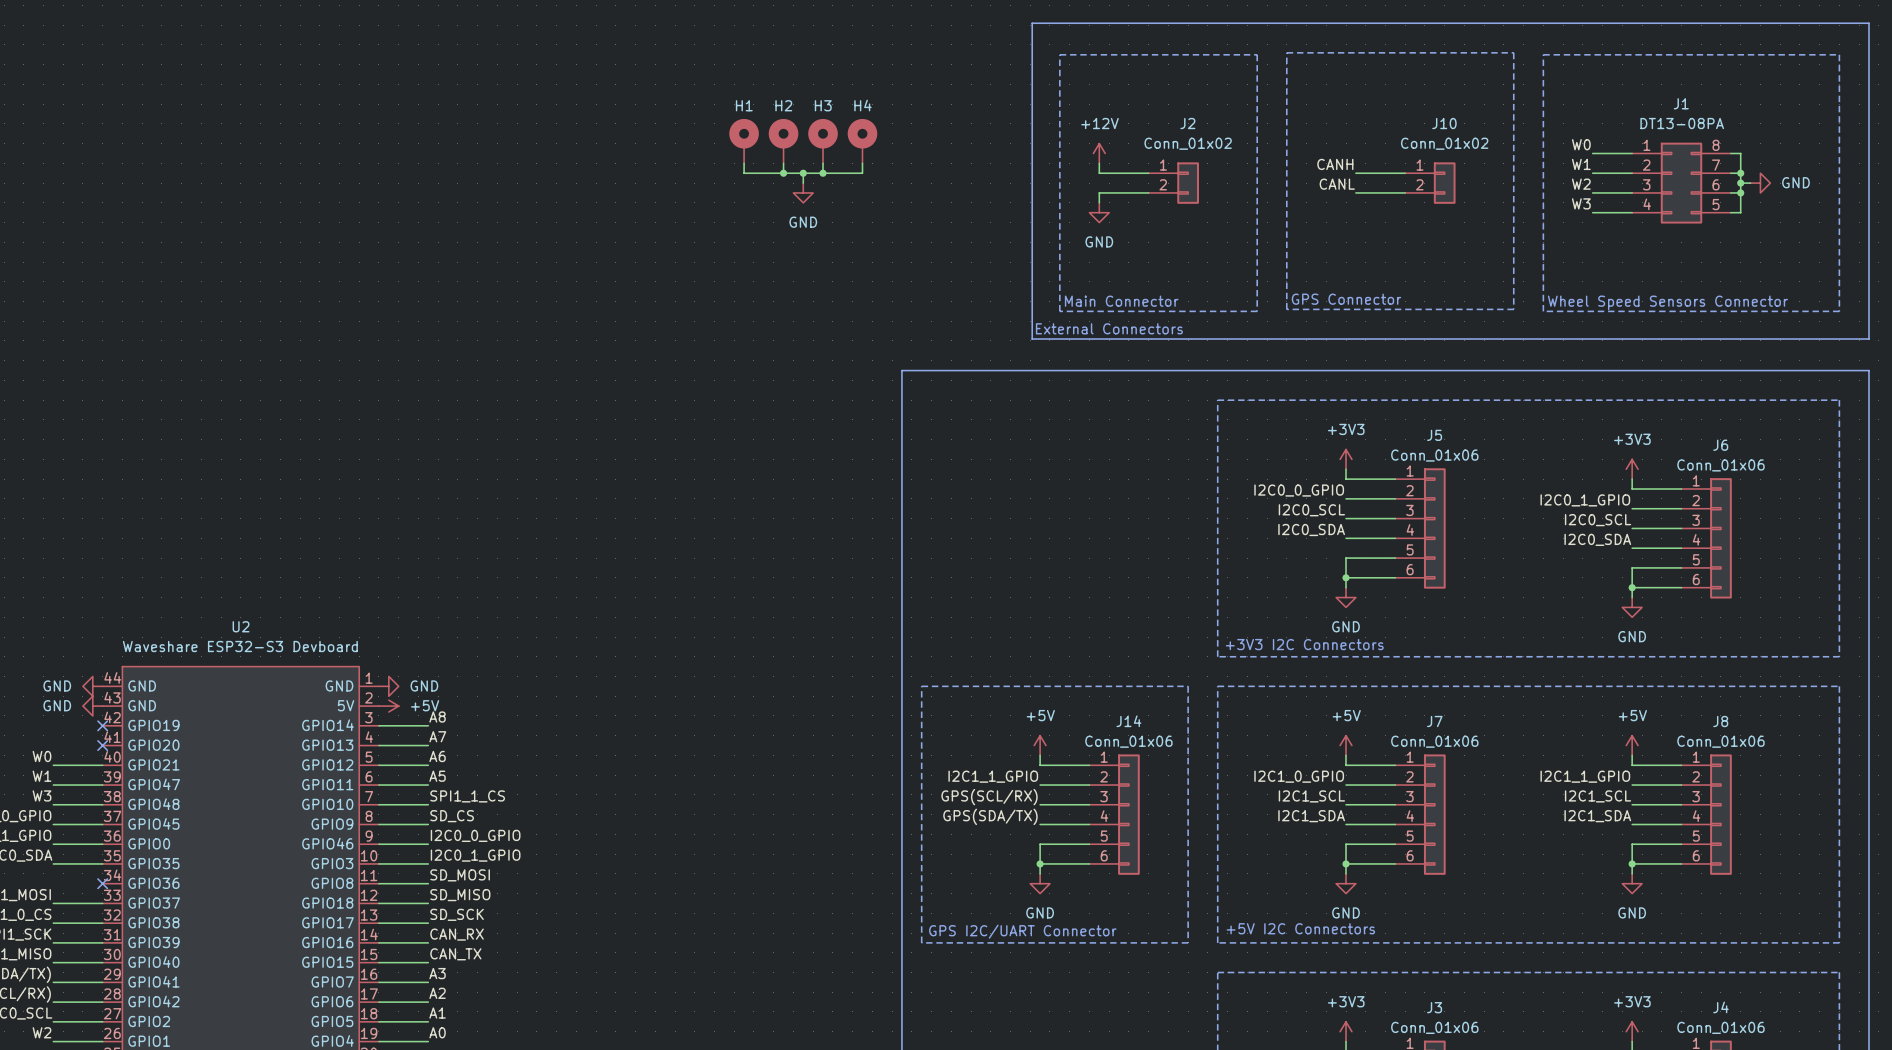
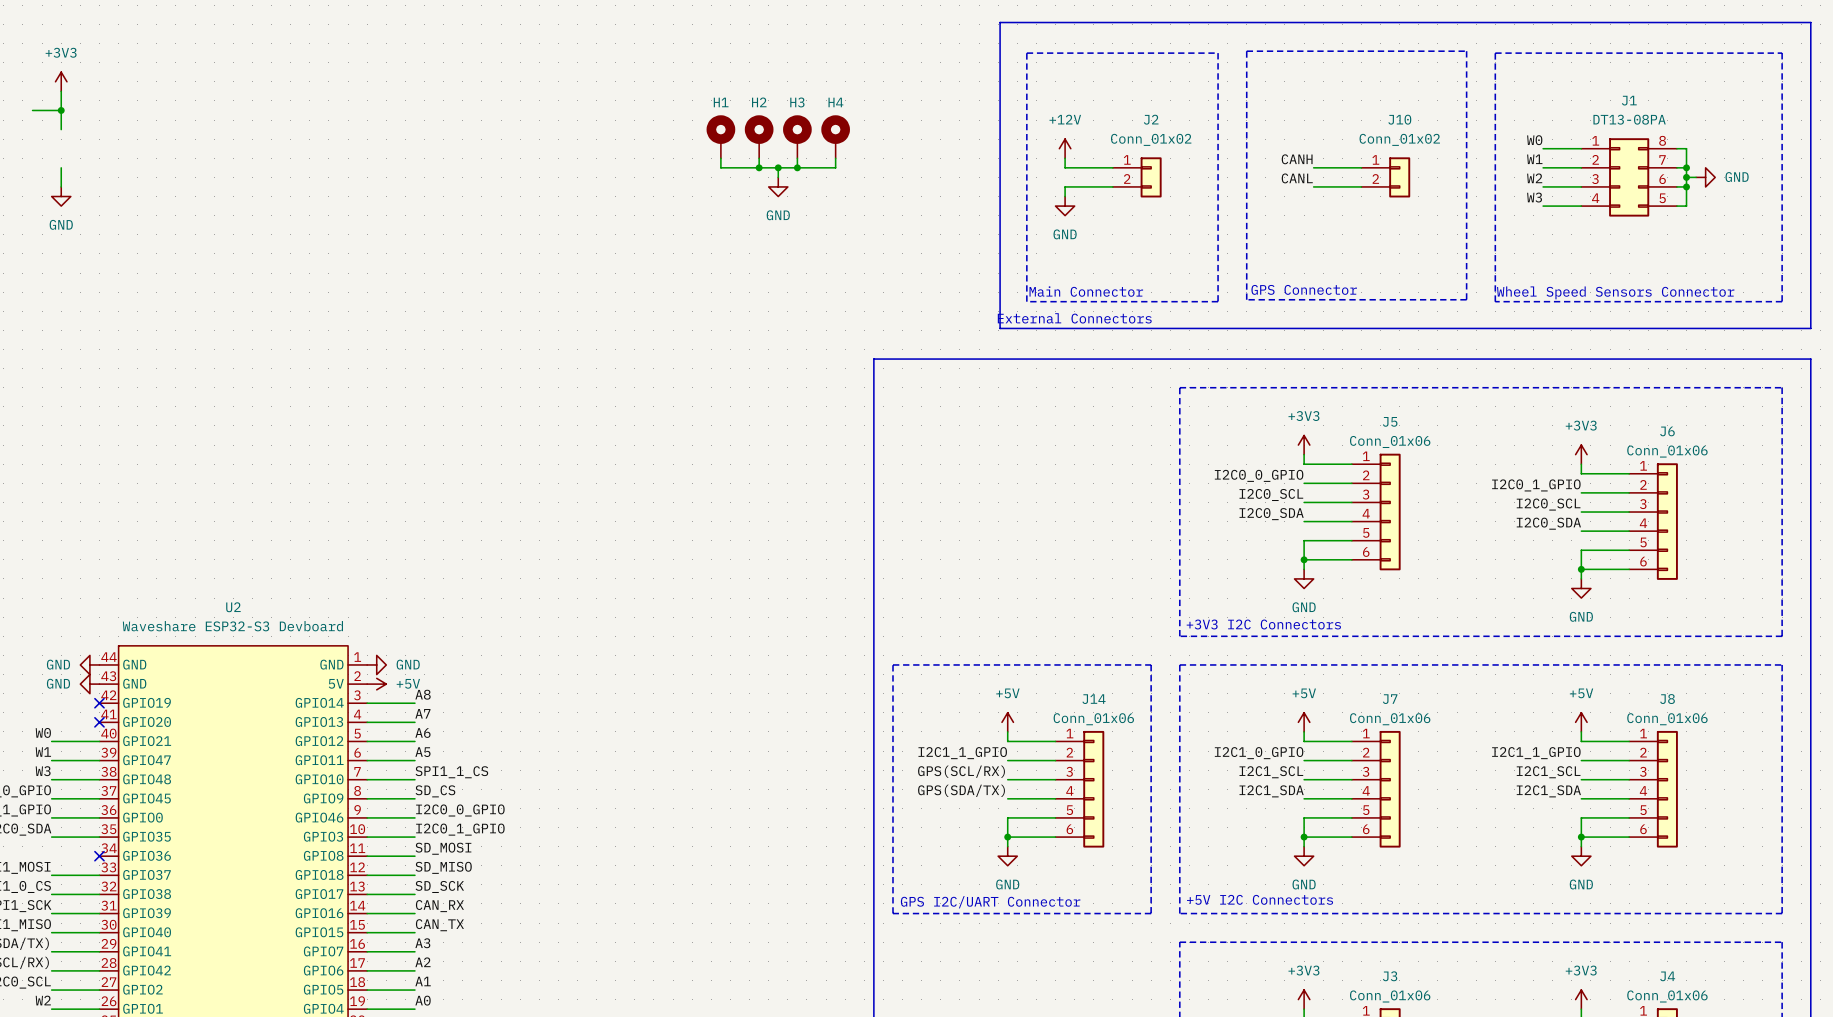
power symbol: none -> +3V3 (61, 81)
wire: none -> (61, 91) (61, 129)
wire: none -> (32, 110) (61, 110)
junction: none -> (61, 110)
wire: none -> (61, 167) (61, 186)
power symbol: none -> GND (61, 196)

